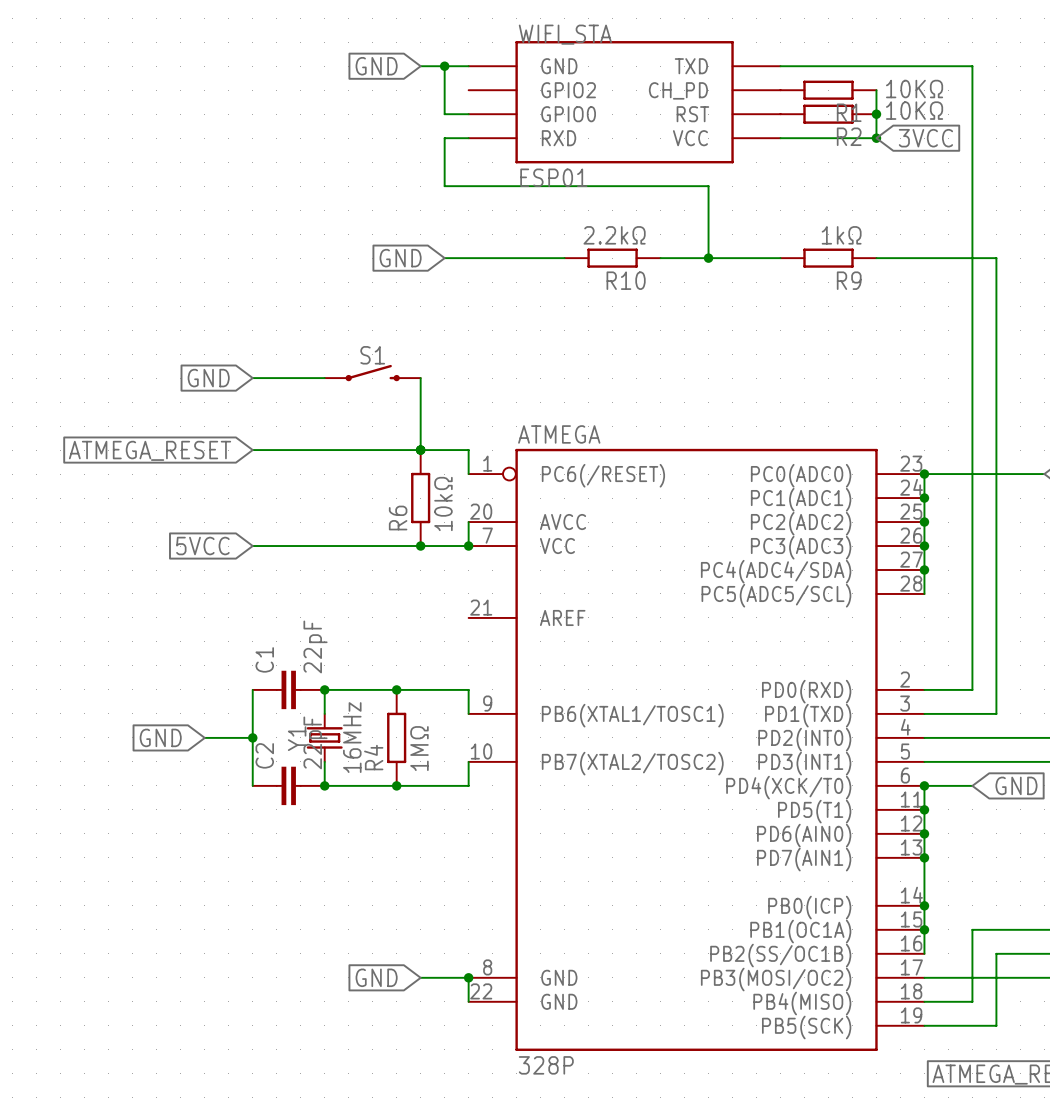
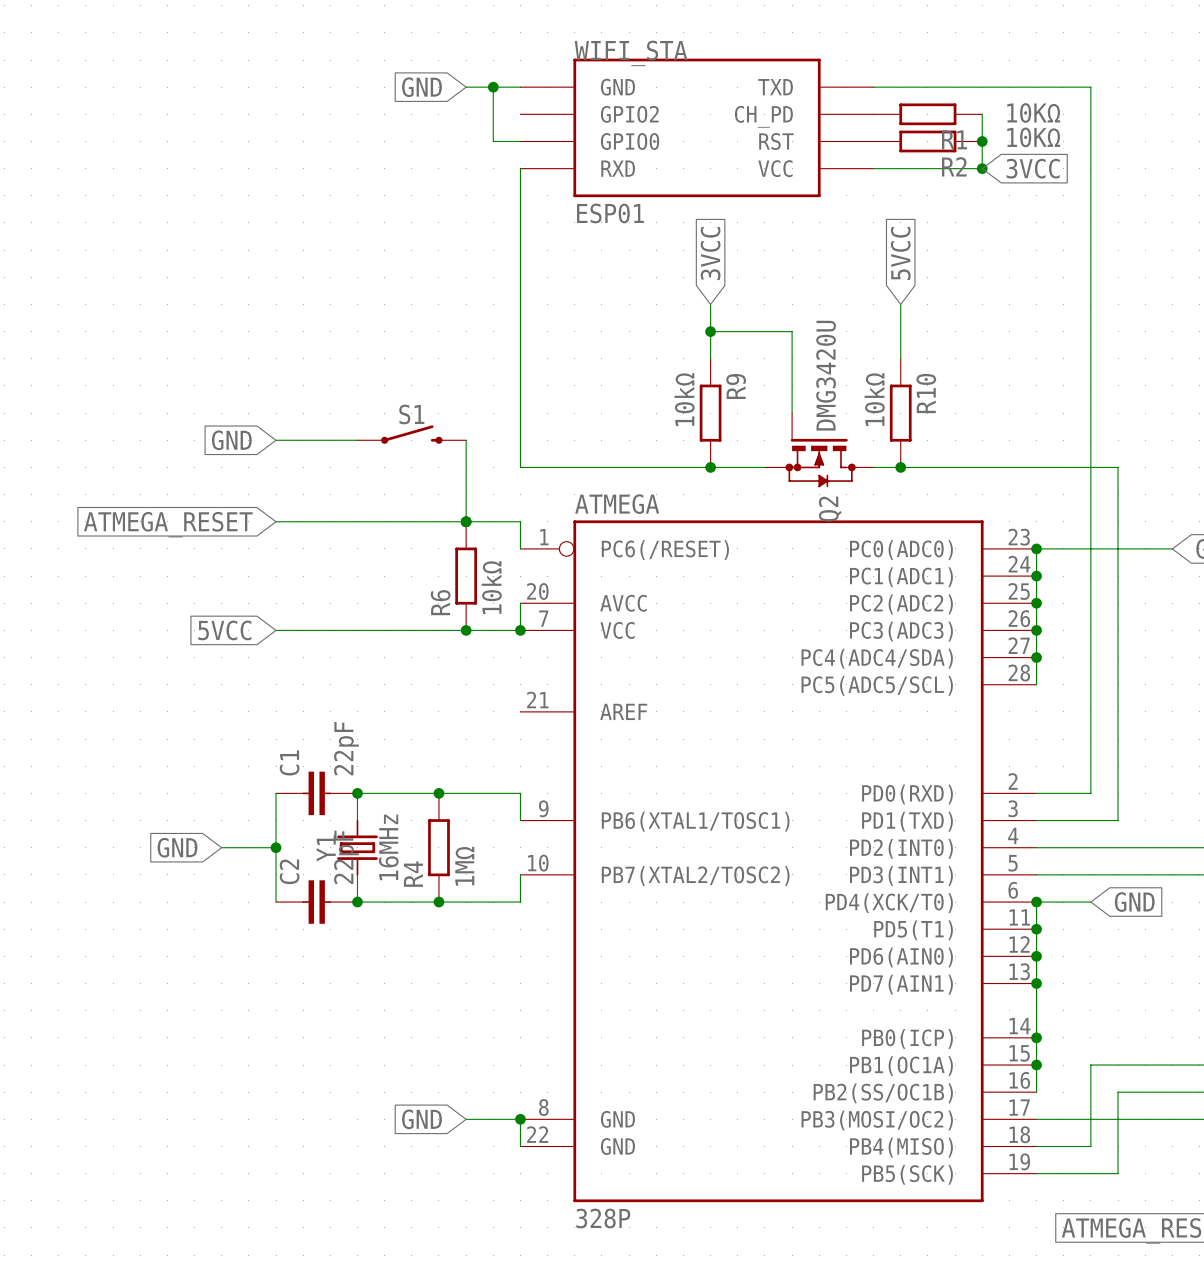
wire: (468, 138) (444, 138) (444, 186) (708, 186) (708, 258) -> (520, 168) (520, 467) (764, 467)
global label: none -> 3VCC (710, 253)
global label: none -> 5VCC (900, 253)
R10 value: 2.2kΩ (614, 235) -> 10kΩ (874, 399)
R9 value: 1kΩ (841, 235) -> 10kΩ (684, 399)
global label: GND (400, 258) -> none
wire: (444, 258) (564, 258) -> none
R10 rotation: 0° (612, 258) -> 90° clockwise (900, 413)
R10 position: (612, 258) -> (900, 413)
wire: none -> (710, 304) (710, 358)
wire: (660, 258) (780, 258) -> none
junction: (708, 258) -> none
wire: none -> (900, 304) (900, 358)
R9 rotation: 0° (828, 258) -> 90° clockwise (710, 413)
R9 position: (828, 258) -> (710, 413)
wire: (876, 258) (996, 258) (996, 402) -> (873, 467) (1118, 467)
R10 name position: R10 (626, 280) -> R10 (926, 393)
R9 name position: R9 (849, 280) -> R9 (736, 386)
wire: none -> (710, 331) (792, 331) (792, 413)
junction: none -> (710, 331)
text: none -> DMG3420U (826, 375)
Q2: none -> (819, 450)
junction: none -> (710, 467)
junction: none -> (900, 467)

